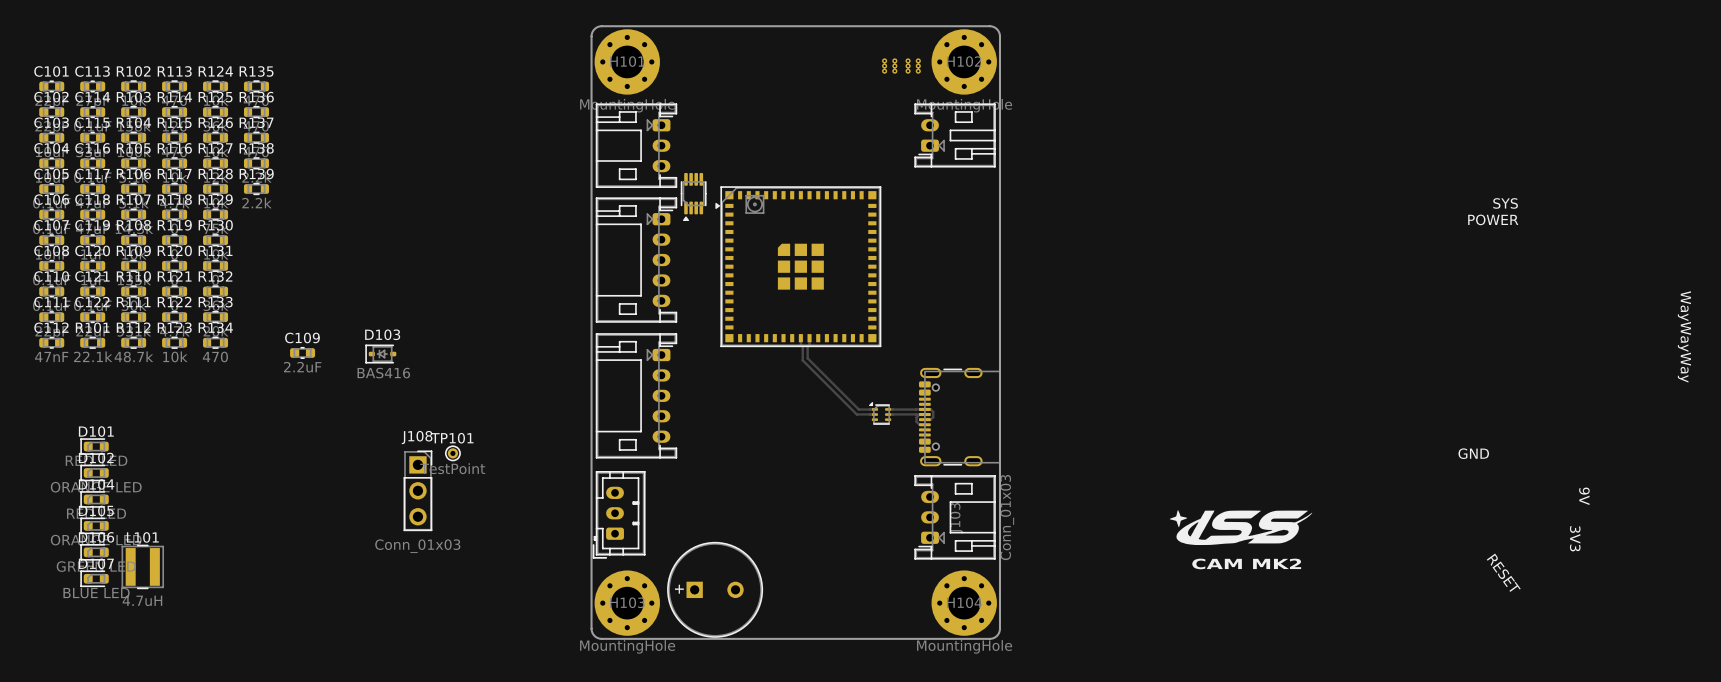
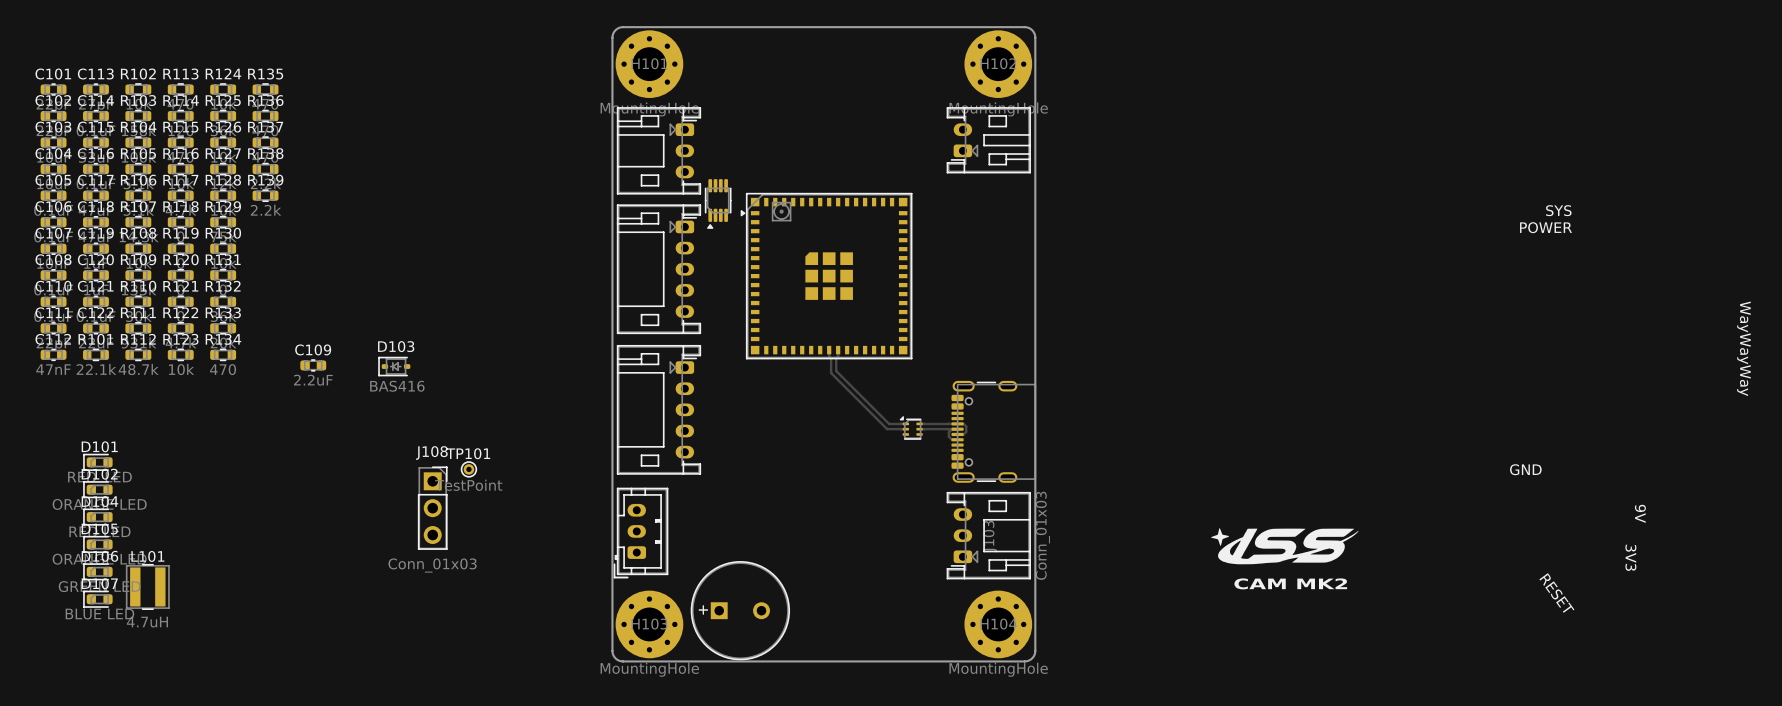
part: (901, 66) -> none

